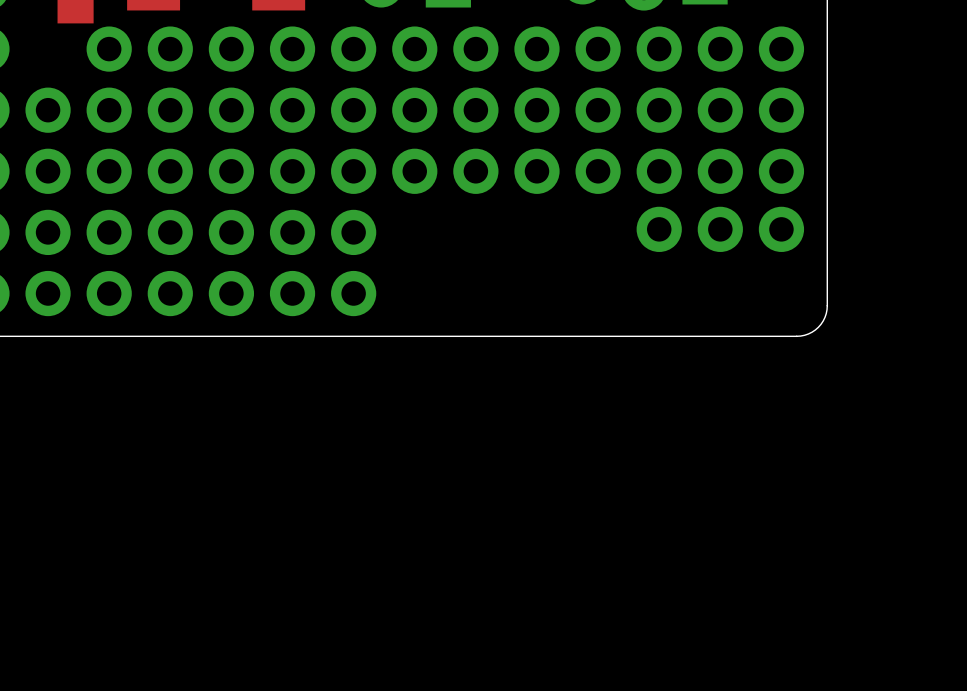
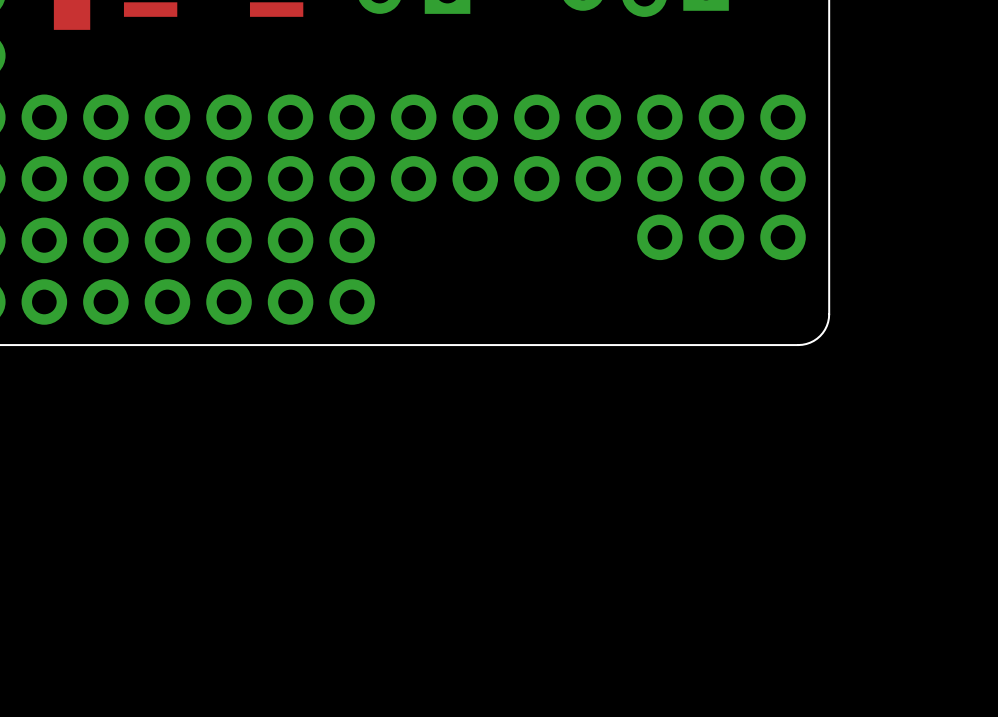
part: (445, 49) -> none

